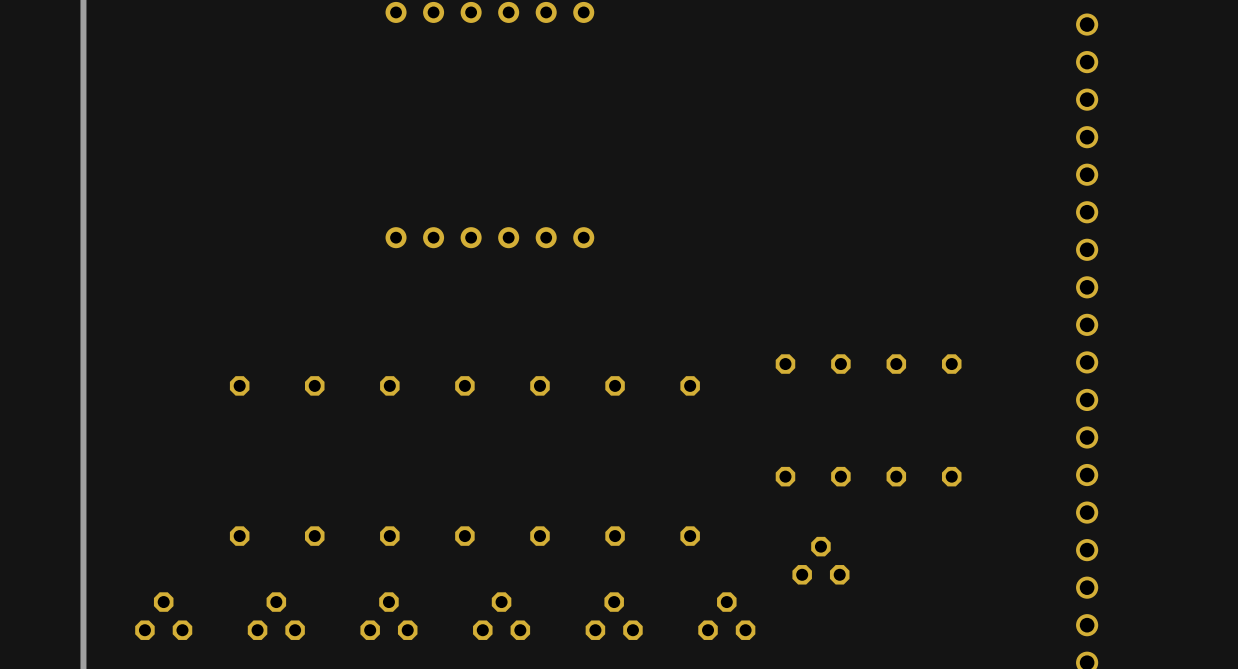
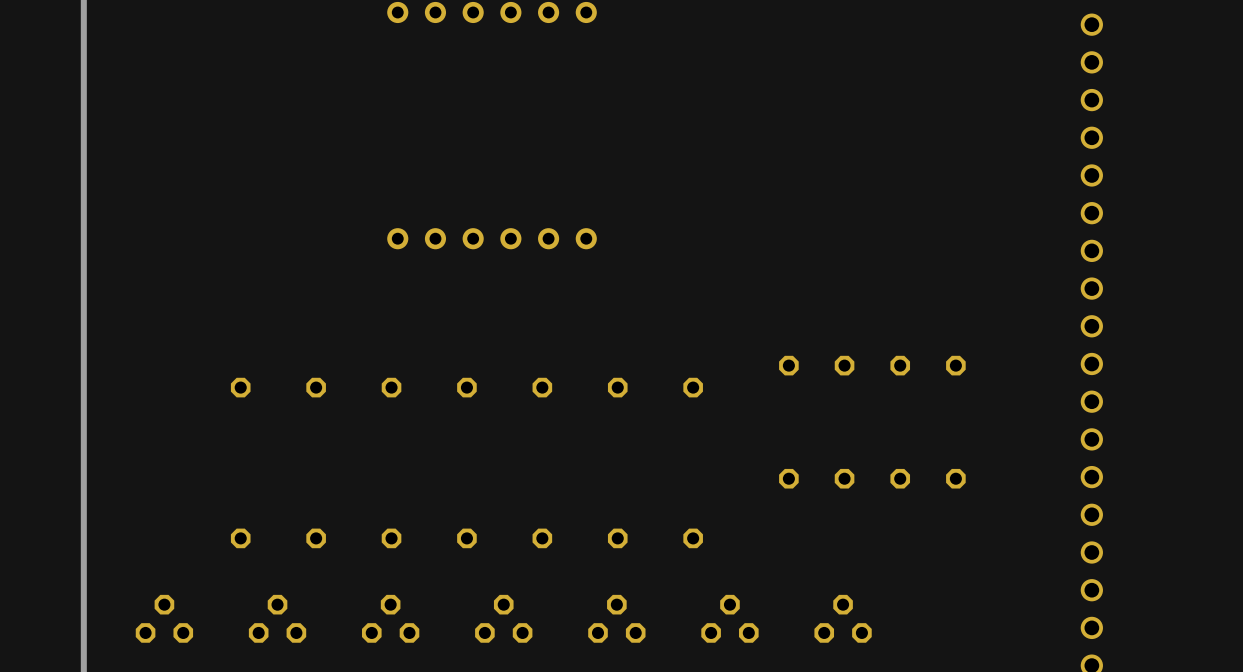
part position: (820, 560) -> (843, 618)

